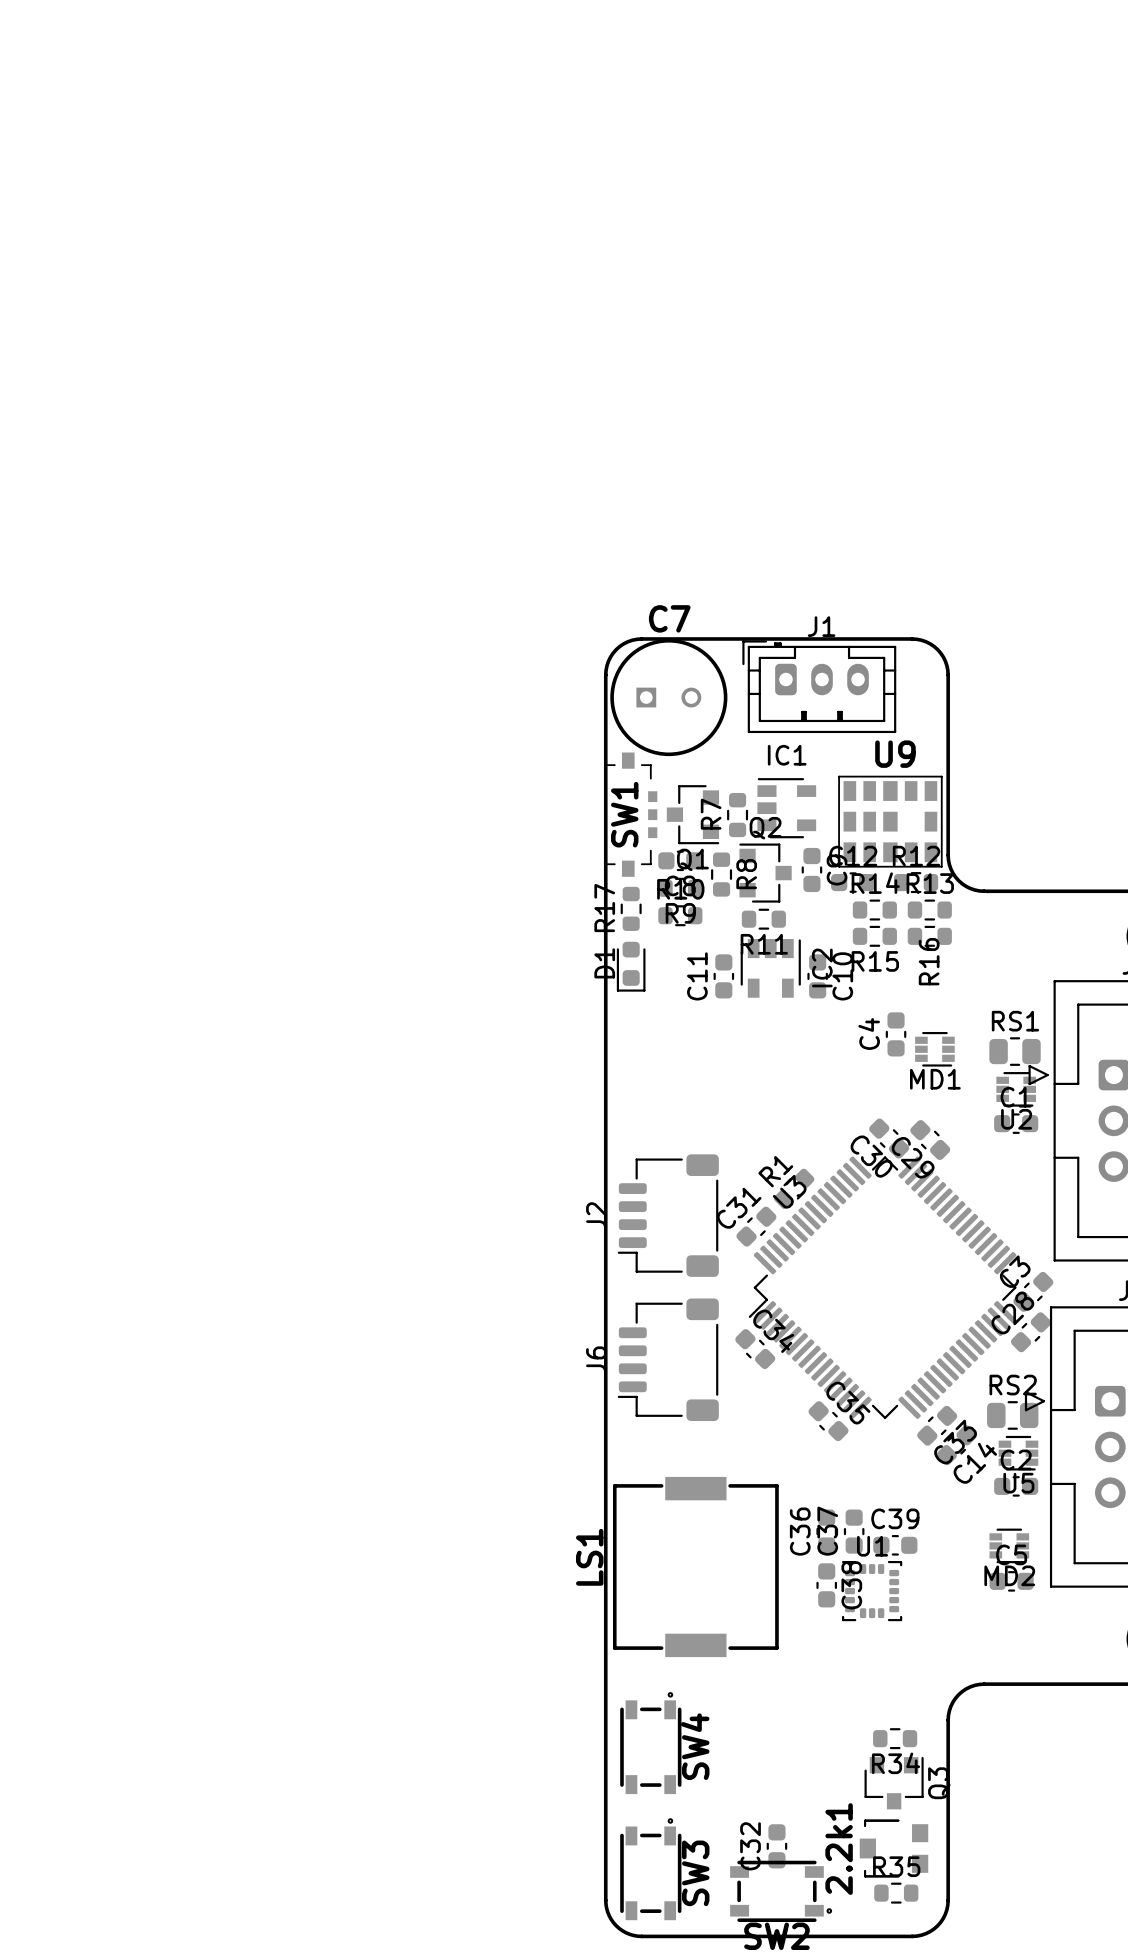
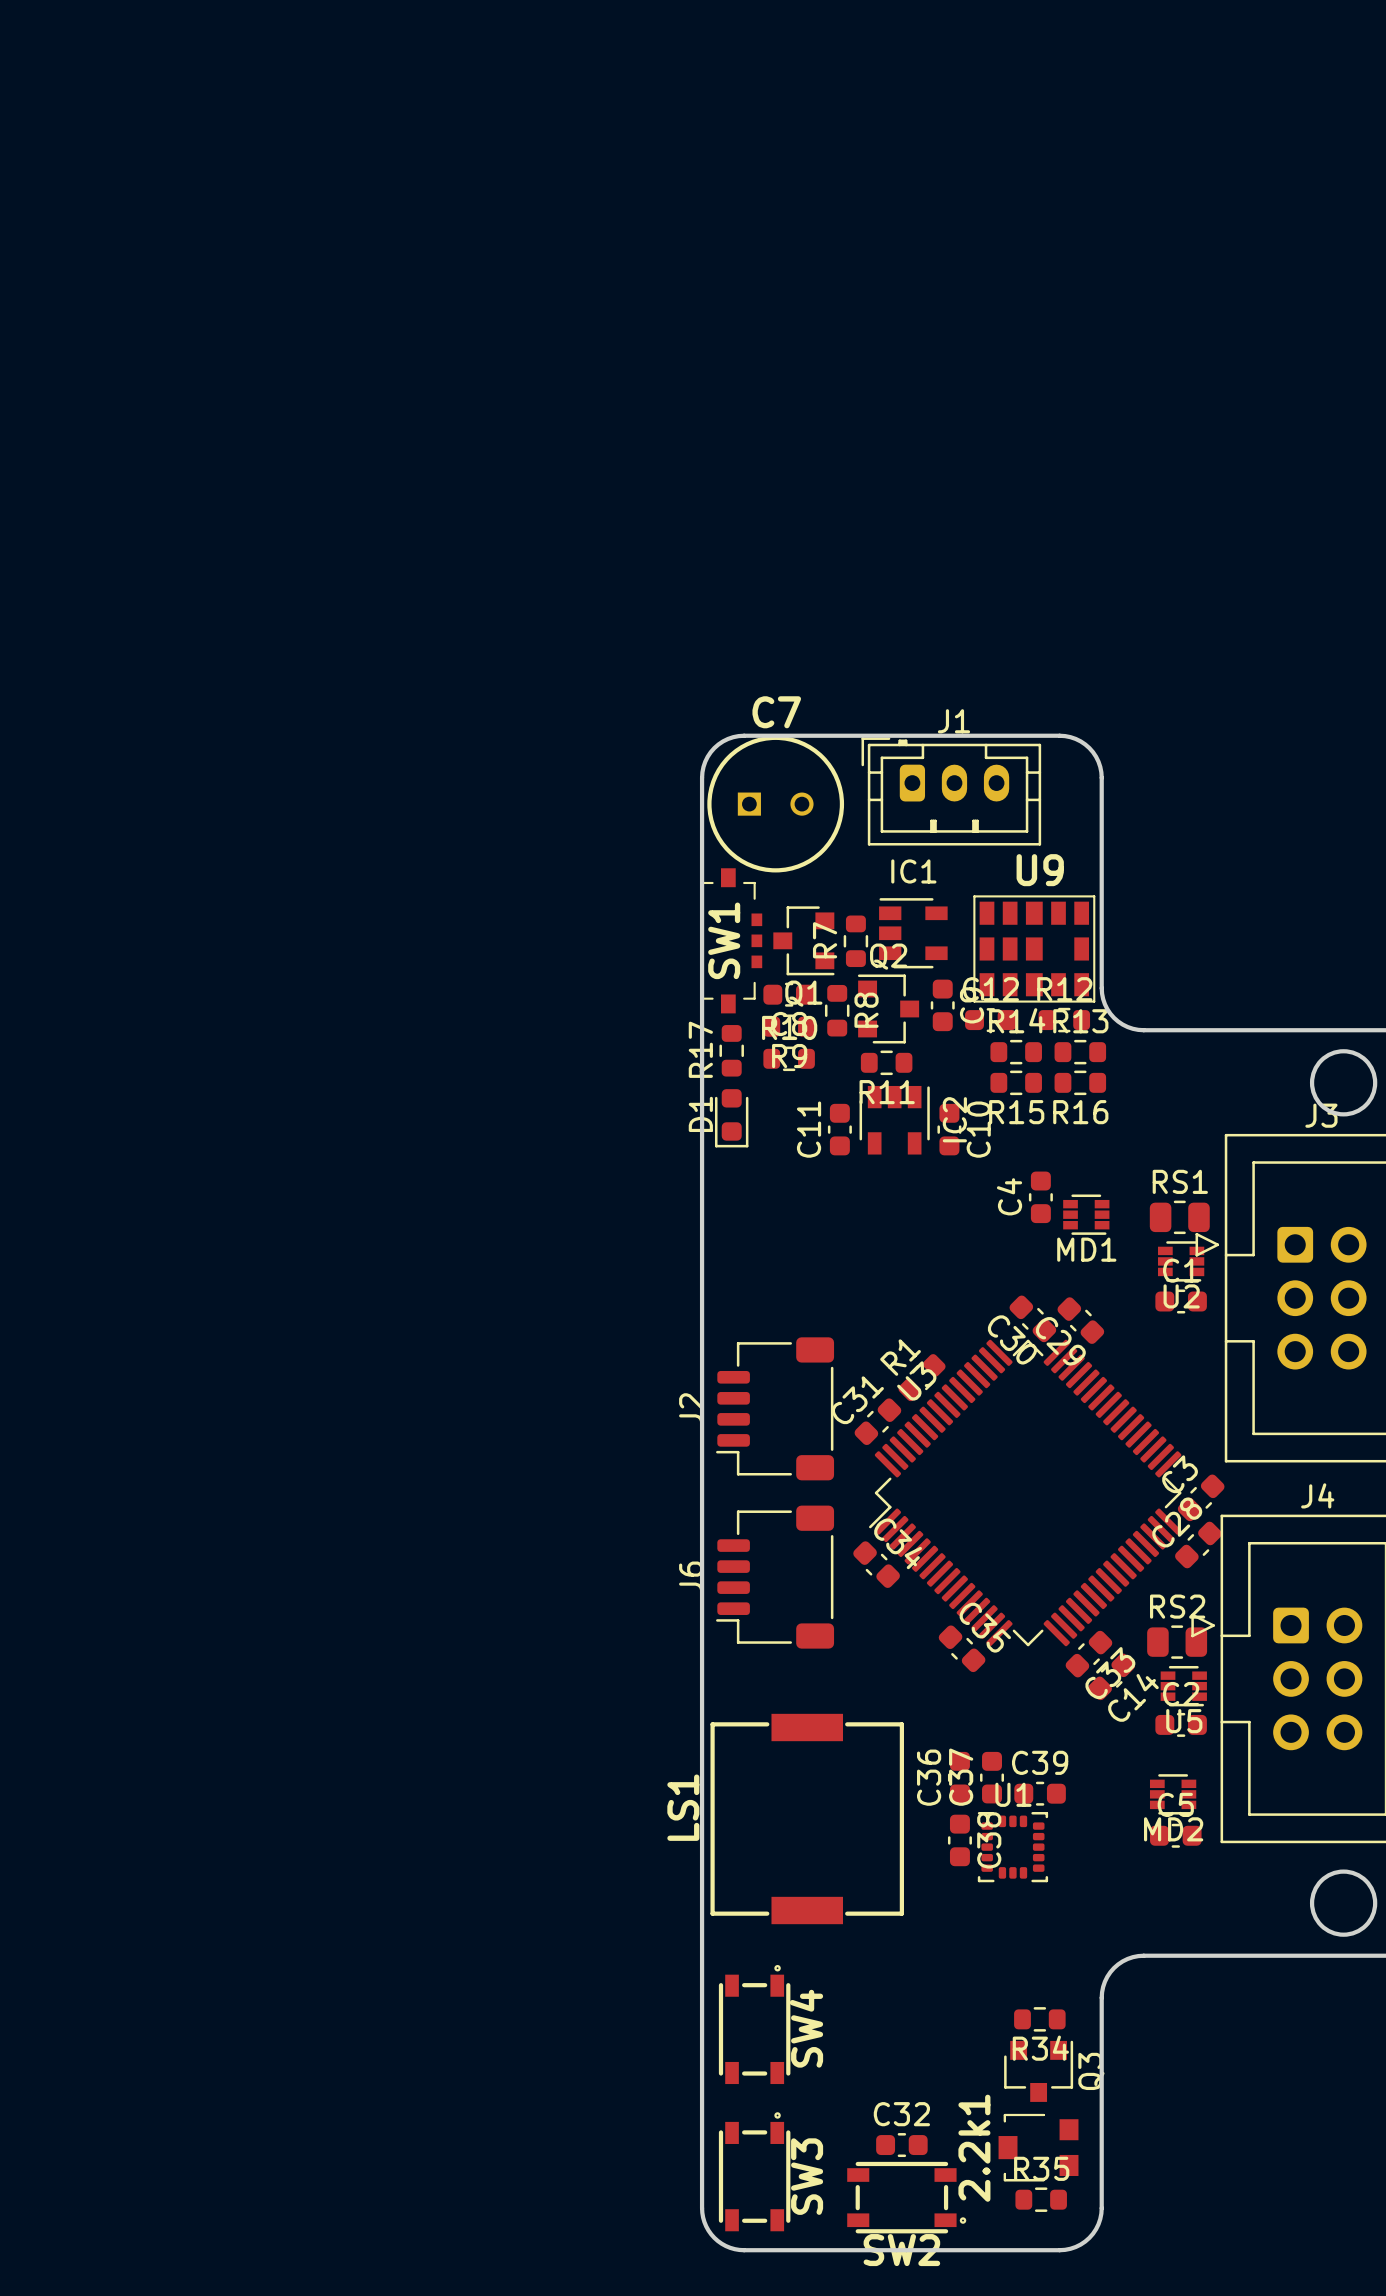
R16 name rotation: 0° (929, 961) -> 90° clockwise (1080, 1112)
C32 rotation: 0° (776, 1846) -> 90° clockwise (901, 2145)

